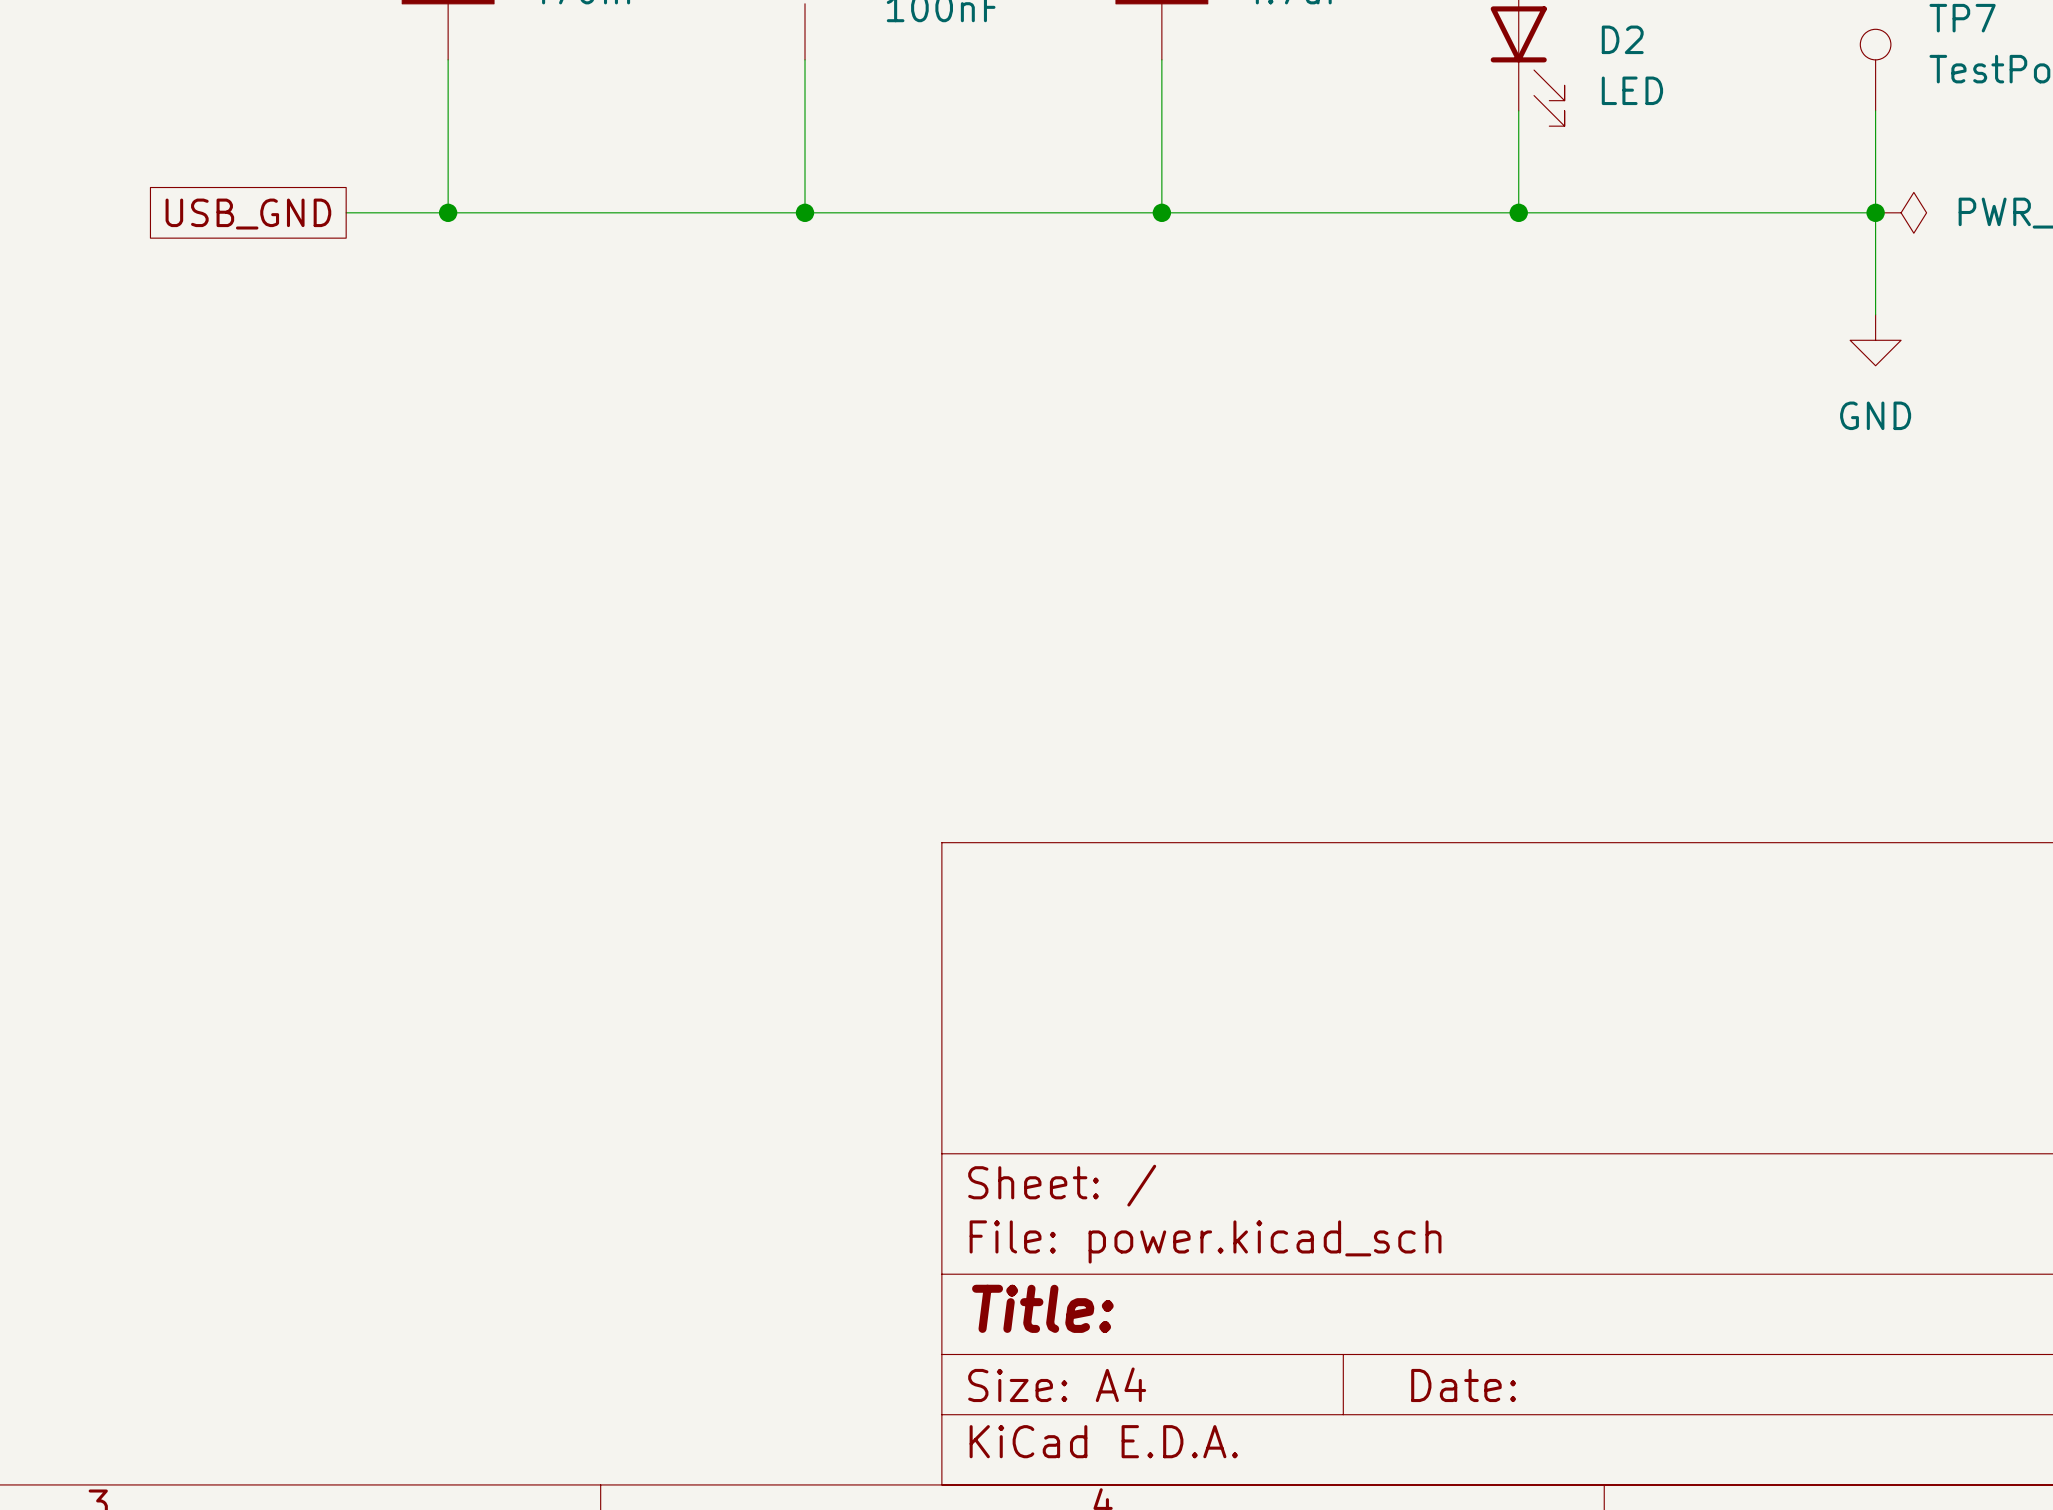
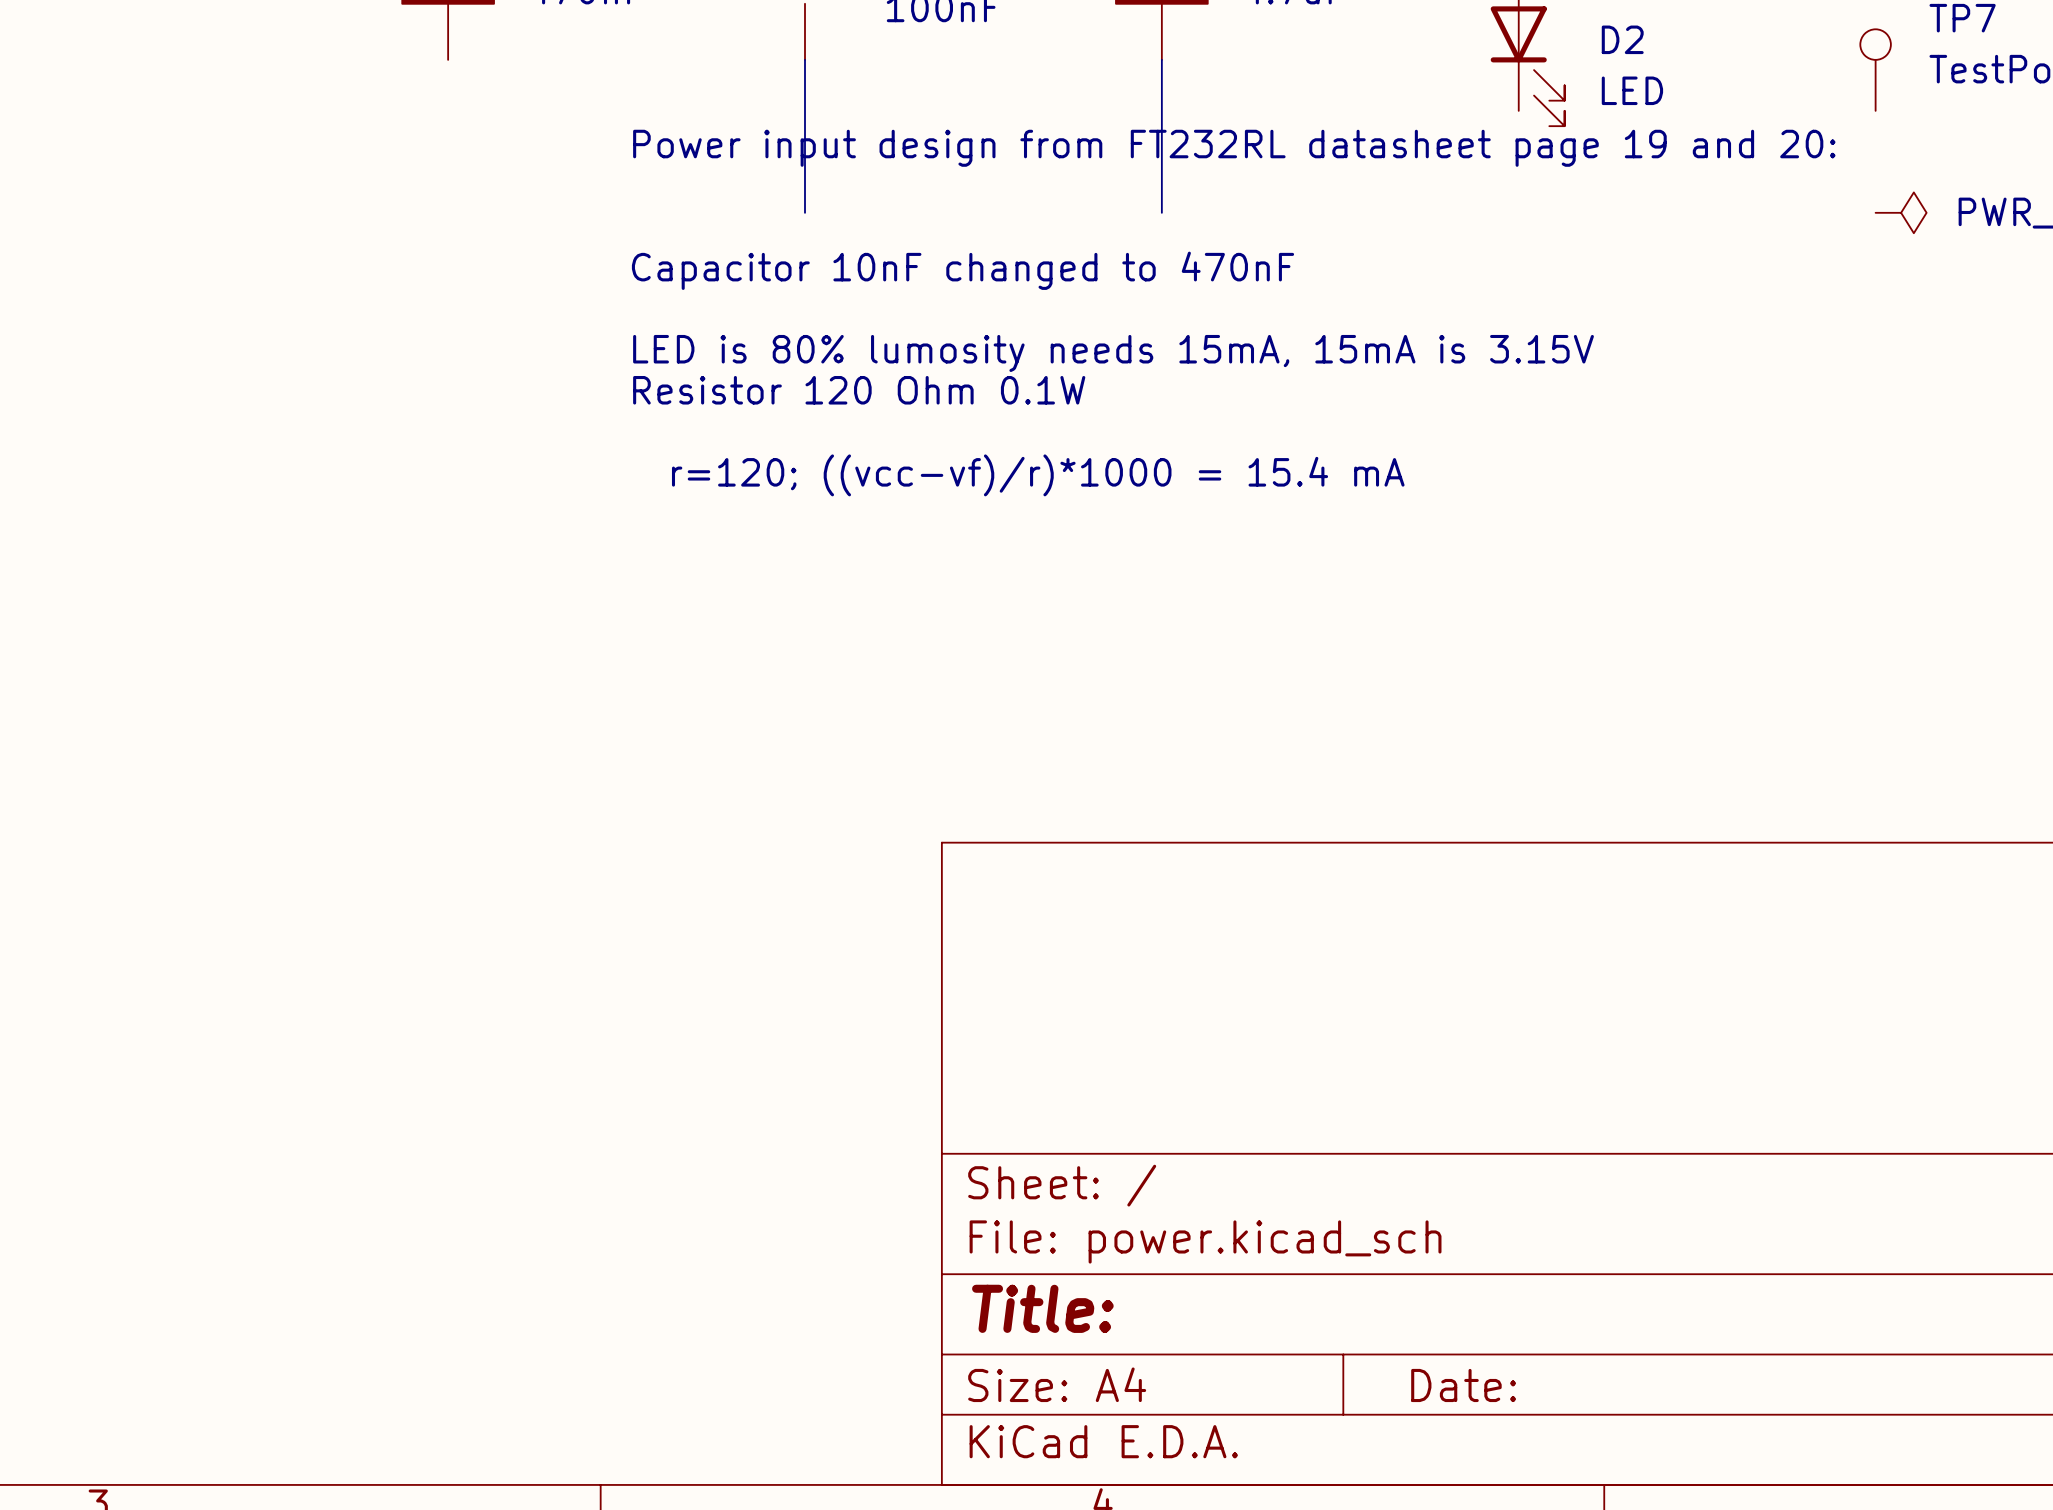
wire: (448, 59) (448, 212) -> none
wire: (1518, 110) (1518, 212) -> none
wire: (1875, 110) (1875, 314) -> none
text: none -> Power input design from FT232RL datasheet page 19 and 20: (1234, 148)
wire: (346, 212) (1875, 212) -> none
junction: (448, 212) -> none
junction: (805, 212) -> none
junction: (1161, 212) -> none
junction: (1518, 212) -> none
junction: (1875, 212) -> none
global label: USB_GND (248, 214) -> none
text: none -> Capacitor 10nF changed to 470nF (962, 270)
power symbol: GND (1875, 340) -> none
text: none -> LED is 80% lumosity needs 15mA, 15mA is 3.15V (1113, 353)
text: none -> Resistor 120 Ohm 0.1W (859, 390)
text: none -> r=120; ((vcc-vf)/r)*1000 = 15.4 mA (1038, 475)

